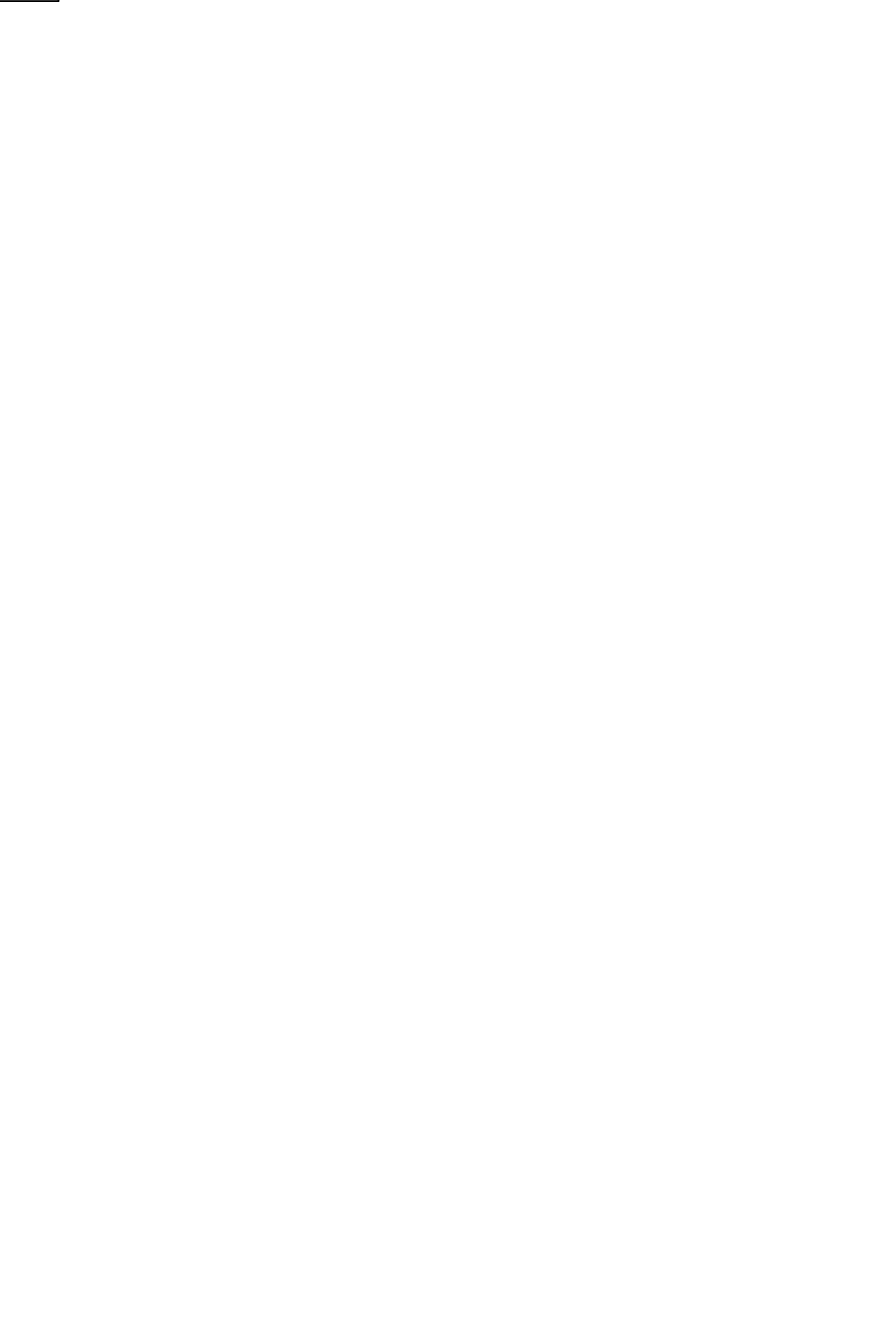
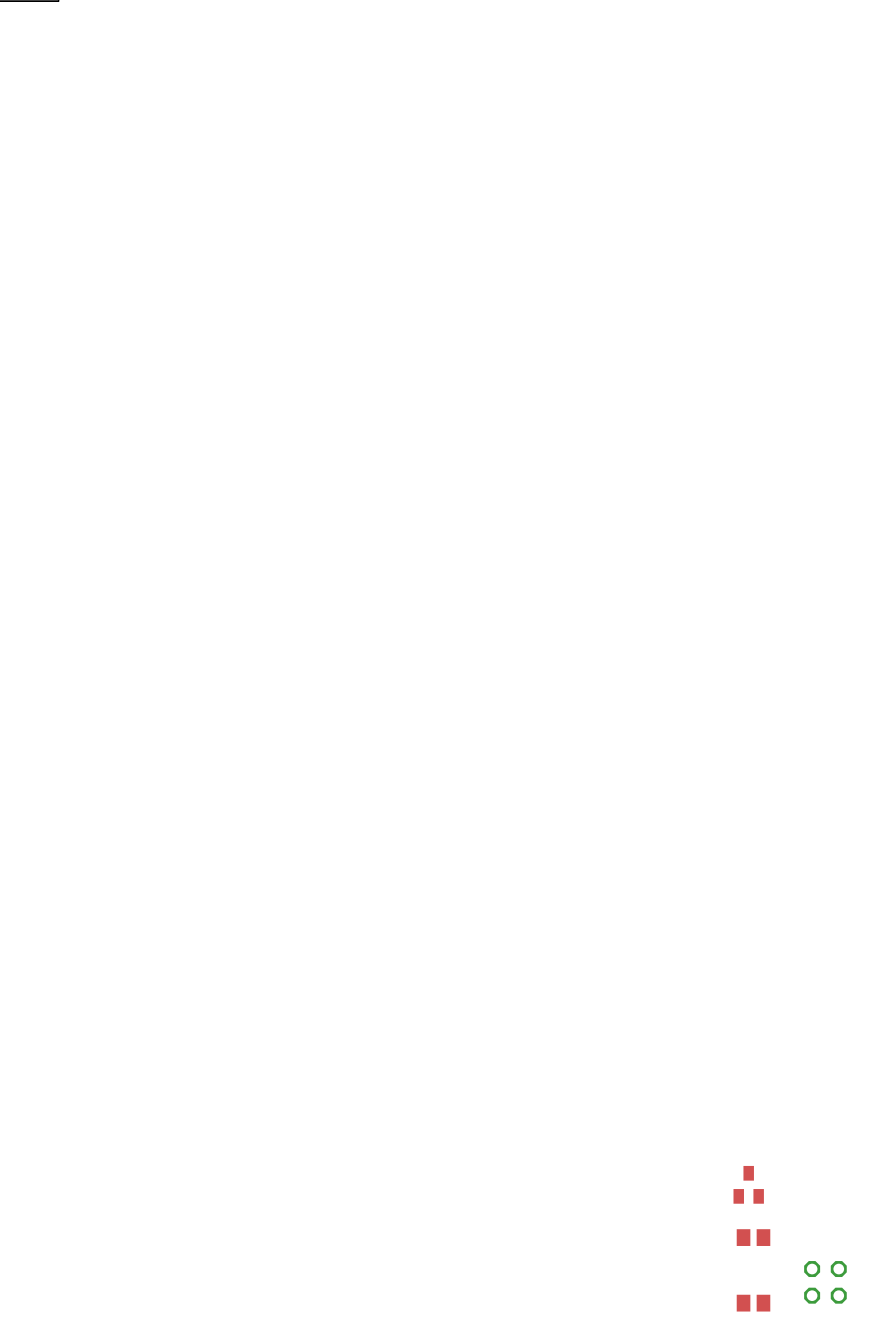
part: none -> (748, 1184)
part: none -> (753, 1237)
part: none -> (825, 1282)
part: none -> (753, 1303)

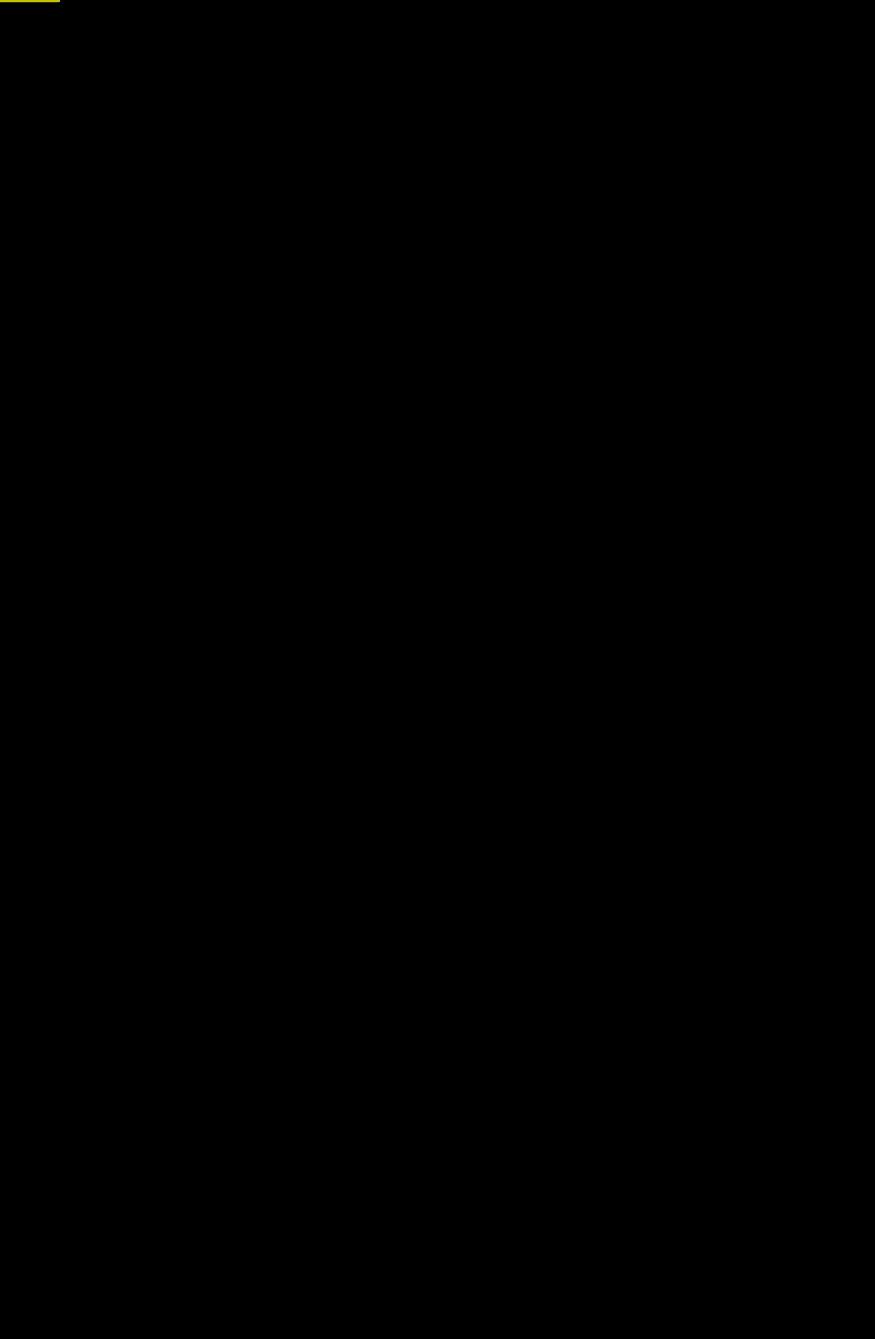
part: (748, 1184) -> none
part: (753, 1237) -> none
part: (825, 1282) -> none
part: (753, 1303) -> none

